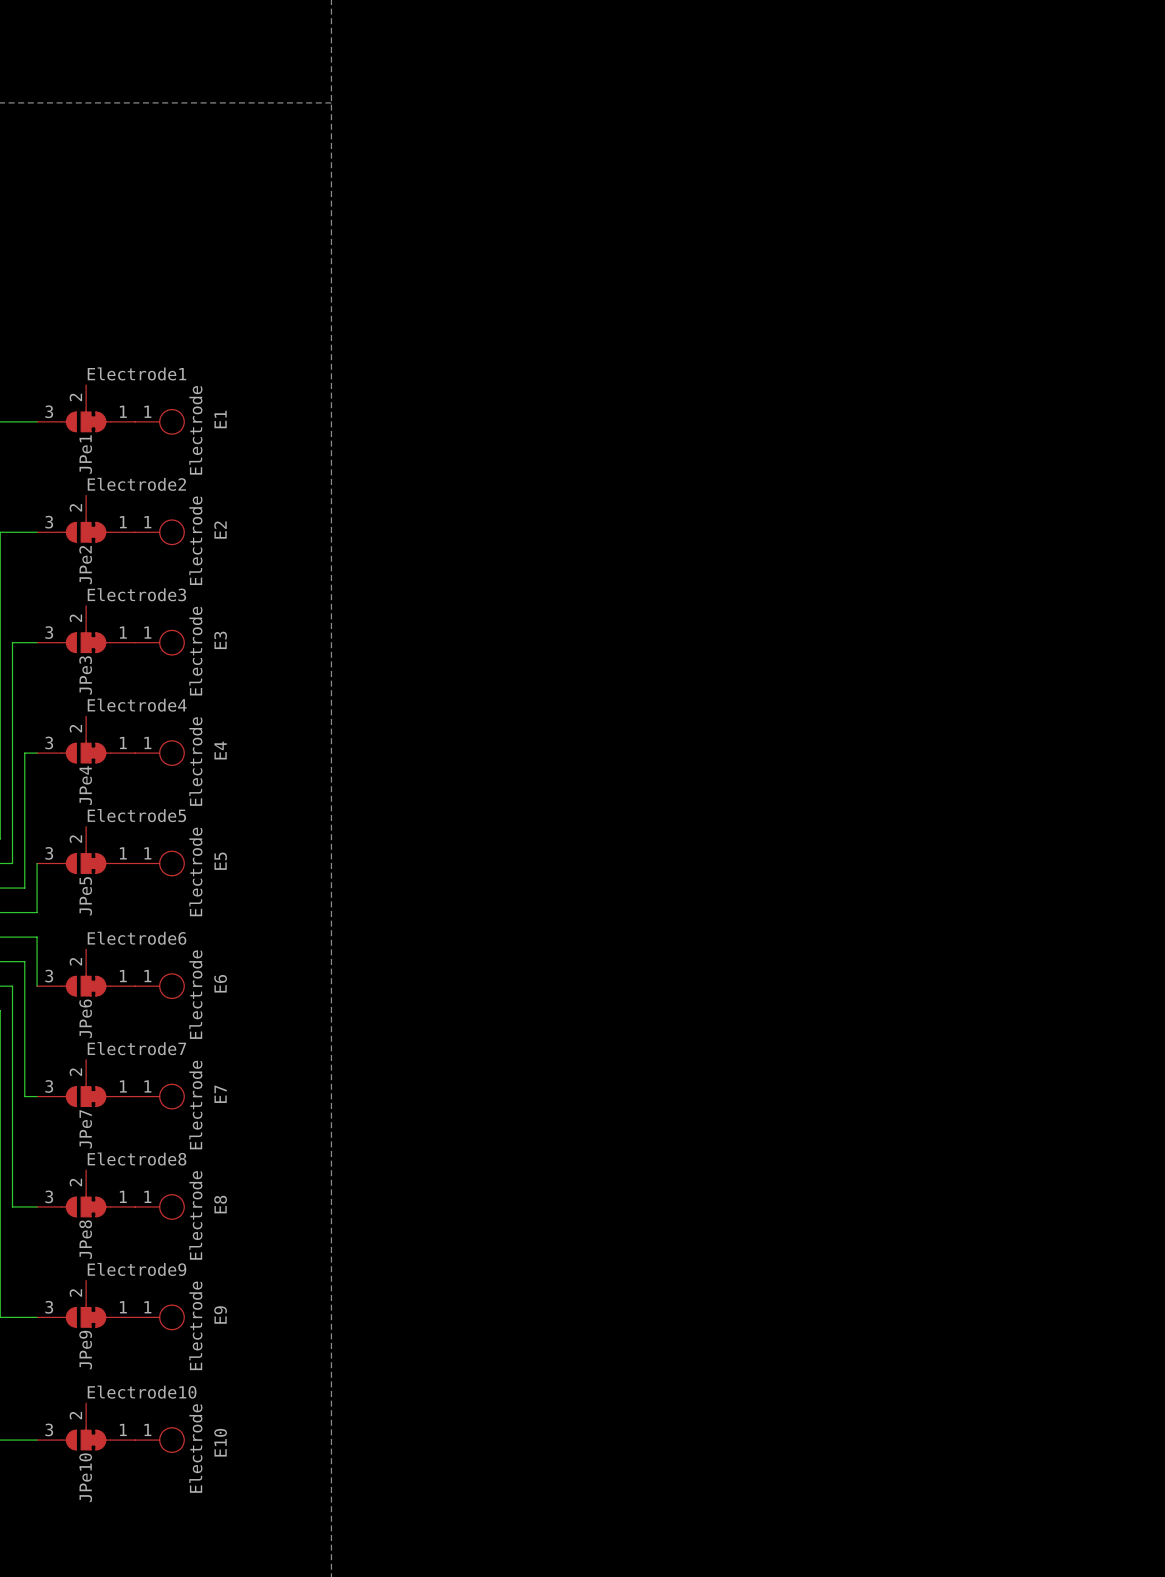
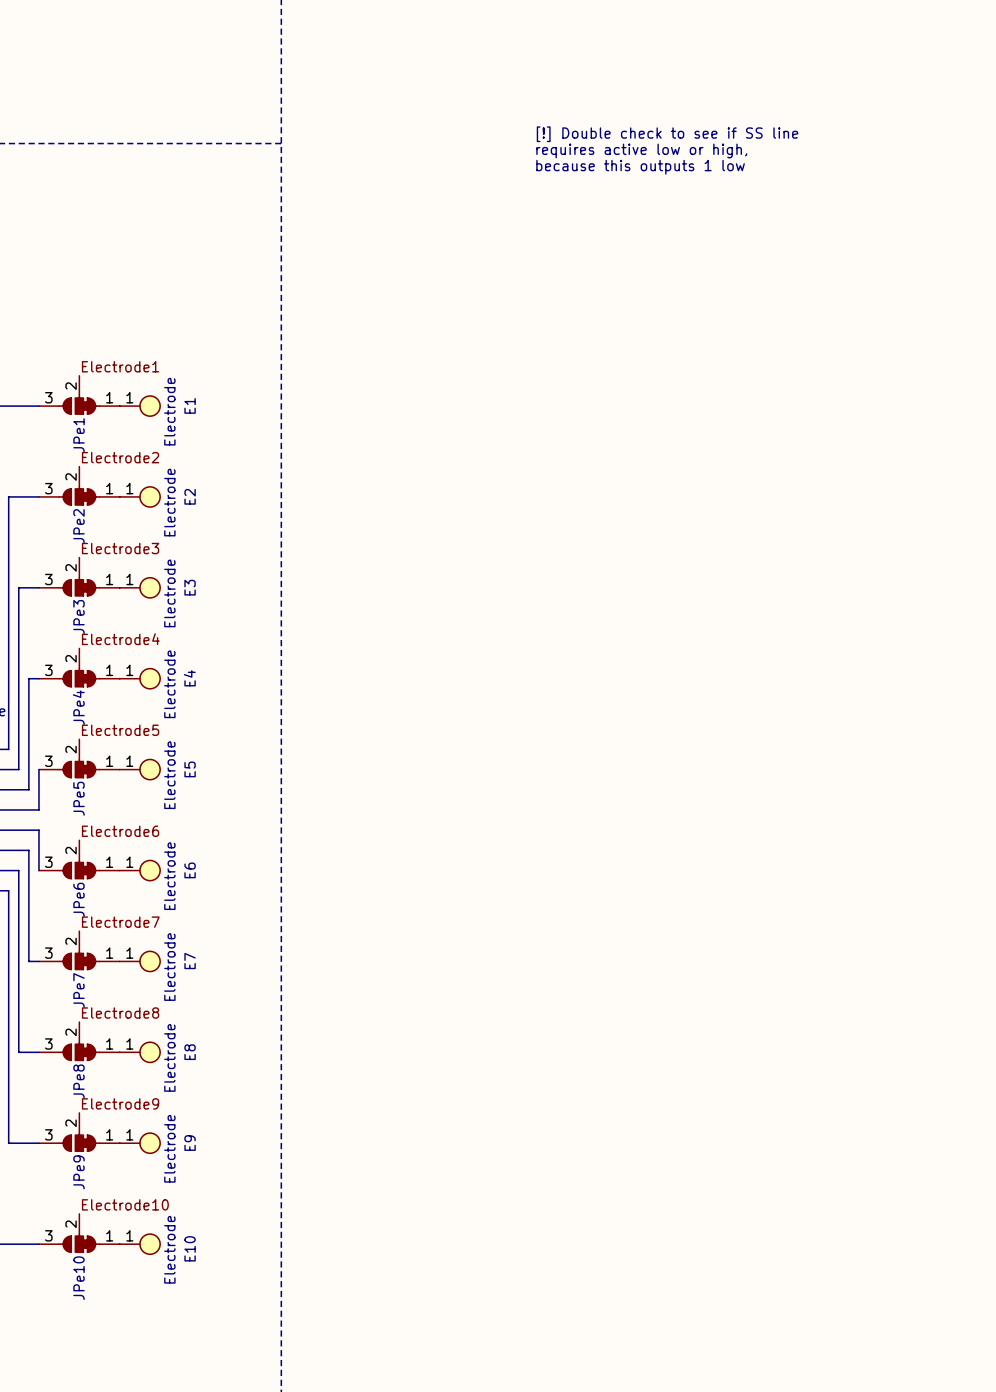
text: none -> [!] Double check to see if SS line (667, 134)
text: none -> requires active low or high, (641, 150)
text: none -> because this outputs 1 low (640, 167)

